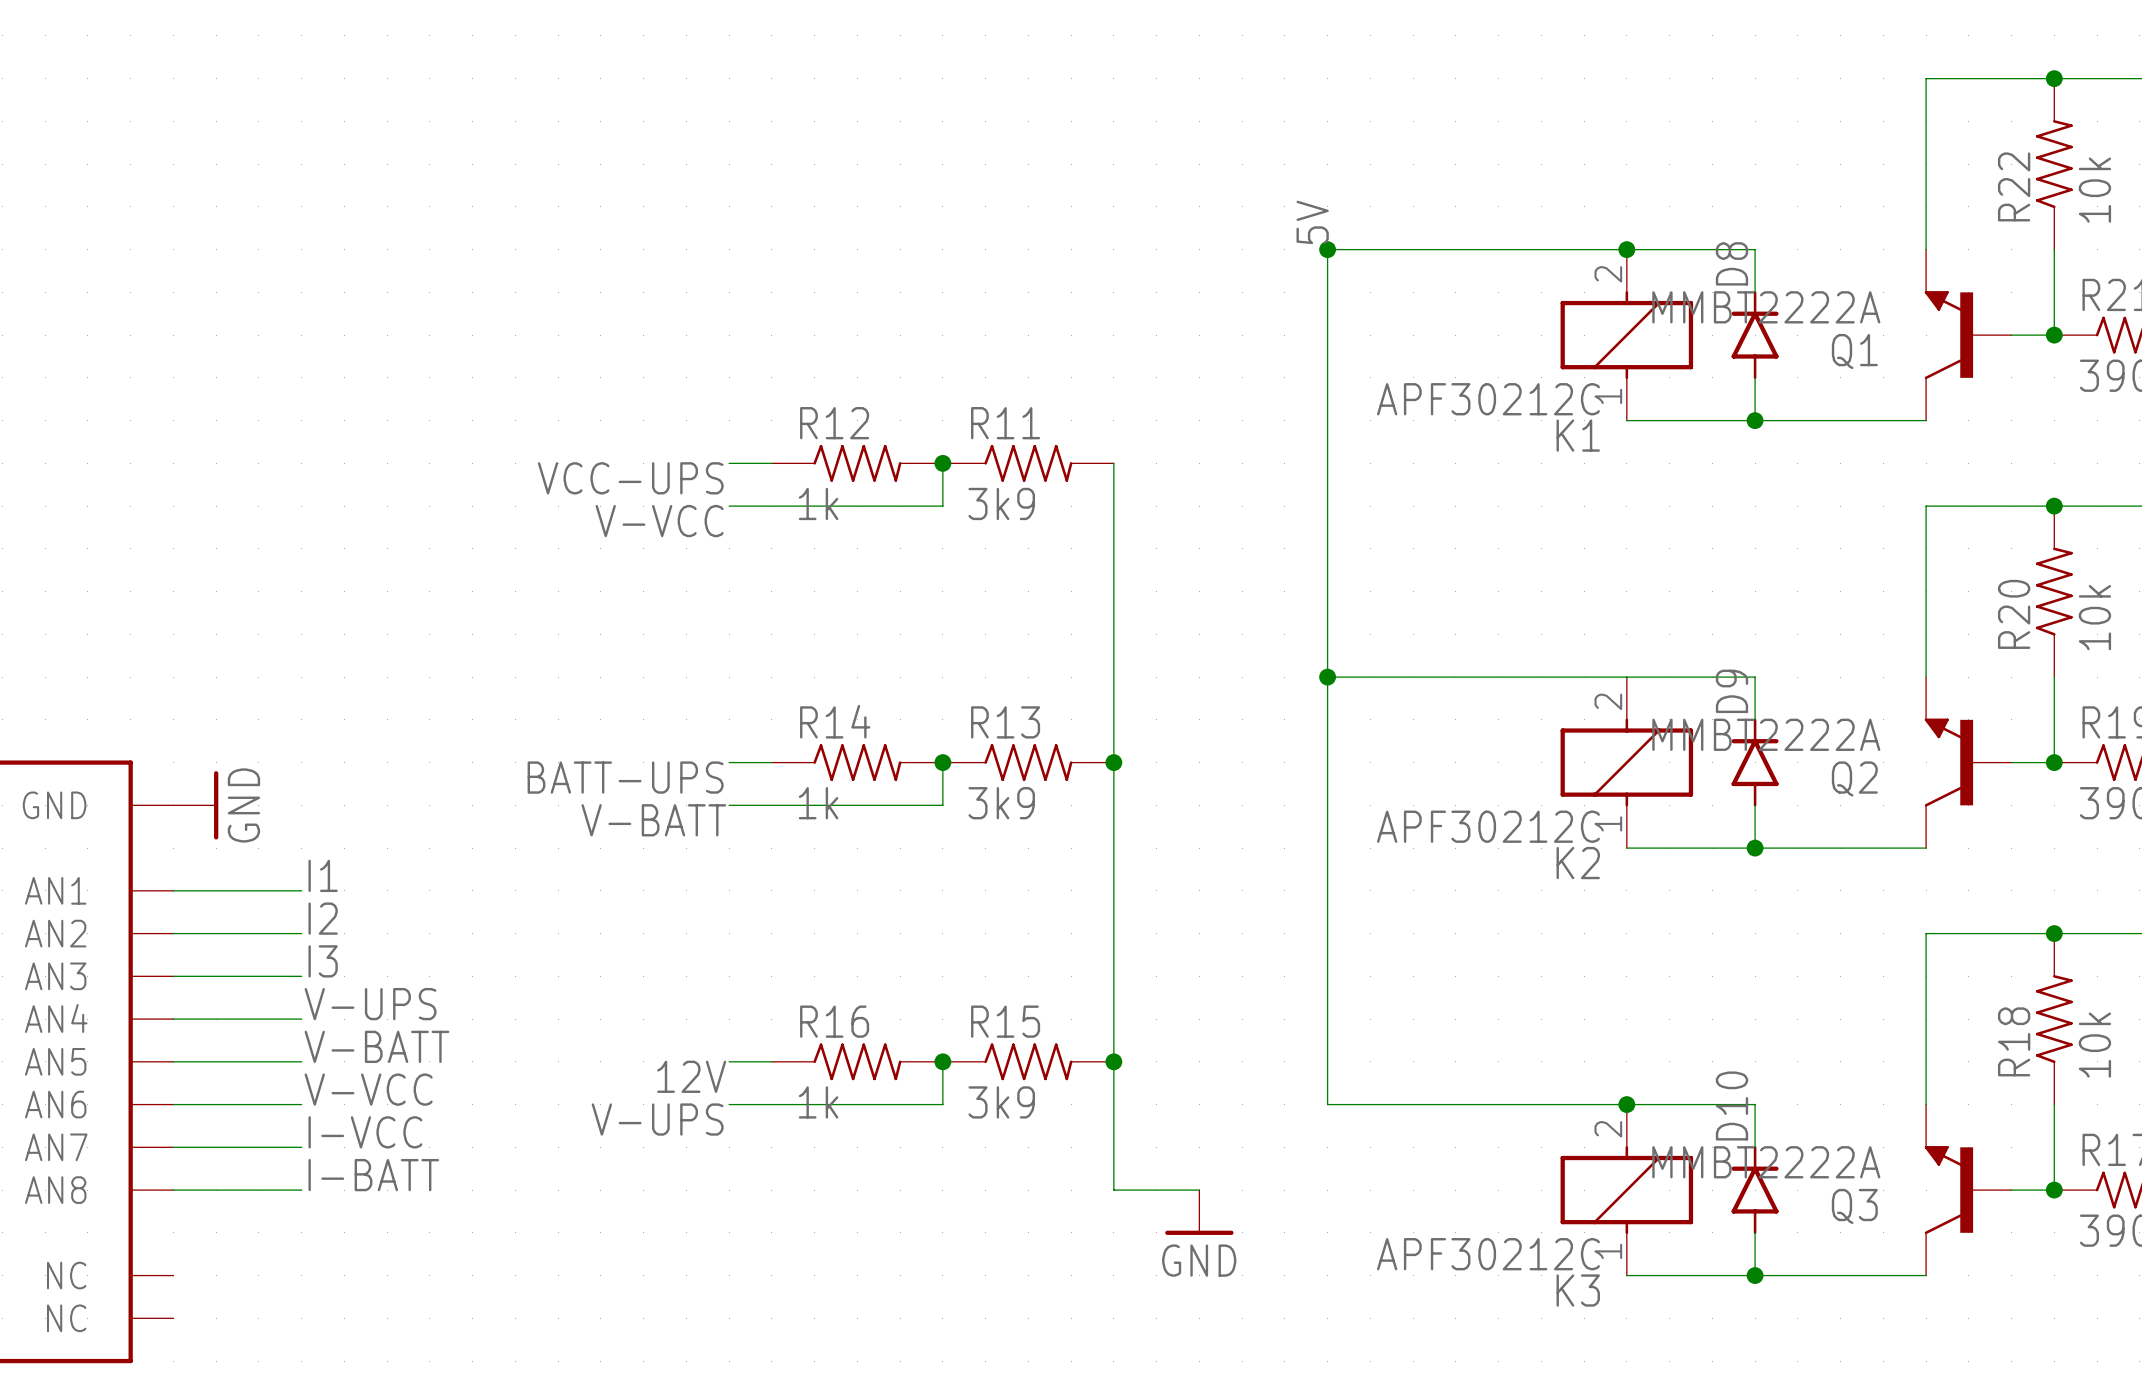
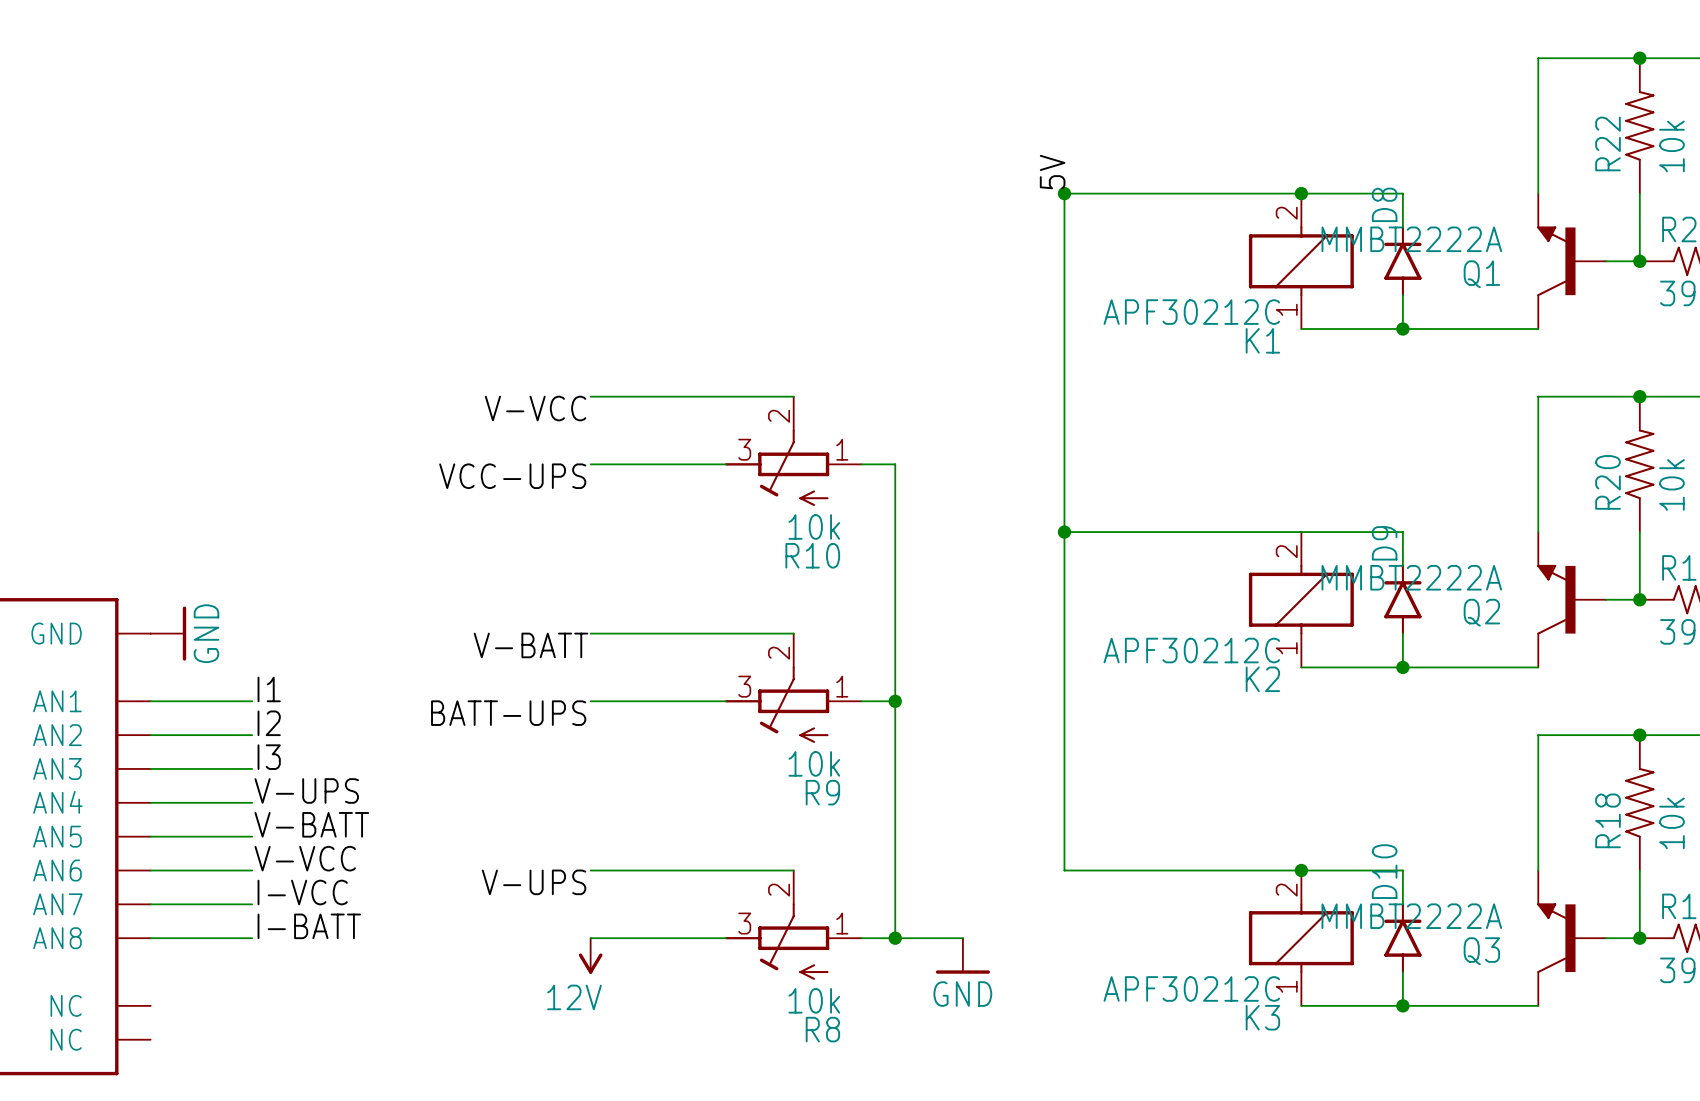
wire: (729, 463) (771, 463) -> none
R12: 1k (857, 463) -> none
wire: (942, 463) (942, 506) -> (793, 396) (759, 396)
junction: (942, 463) -> none
R11: 3k9 (1028, 463) -> none
wire: (1113, 463) (1113, 591) -> (861, 464) (895, 464)
label position: VCC-UPS (630, 478) -> VCC-UPS (512, 476)
R10: none -> 10k (793, 451)
wire: none -> (590, 464) (726, 464)
wire: (729, 762) (771, 762) -> (861, 701) (895, 701)
R14: 1k (857, 762) -> none
wire: (942, 762) (942, 805) -> (793, 633) (759, 633)
junction: (942, 762) -> none
R13: 3k9 (1028, 762) -> none
junction: (1113, 762) -> none
label position: BATT-UPS (625, 777) -> BATT-UPS (508, 713)
R9: none -> 10k (793, 688)
wire: none -> (590, 701) (726, 701)
junction: none -> (895, 701)
wire: (729, 1061) (771, 1061) -> (861, 938) (895, 938)
R16: 1k (857, 1061) -> none
wire: (942, 1061) (942, 1104) -> (793, 870) (759, 870)
junction: (942, 1061) -> none
R15: 3k9 (1028, 1061) -> none
junction: (1113, 1061) -> none
label: 12V (691, 1076) -> none
R8: none -> 10k (793, 925)
wire: none -> (590, 938) (726, 938)
junction: none -> (895, 938)
power symbol: none -> 12V (590, 955)

